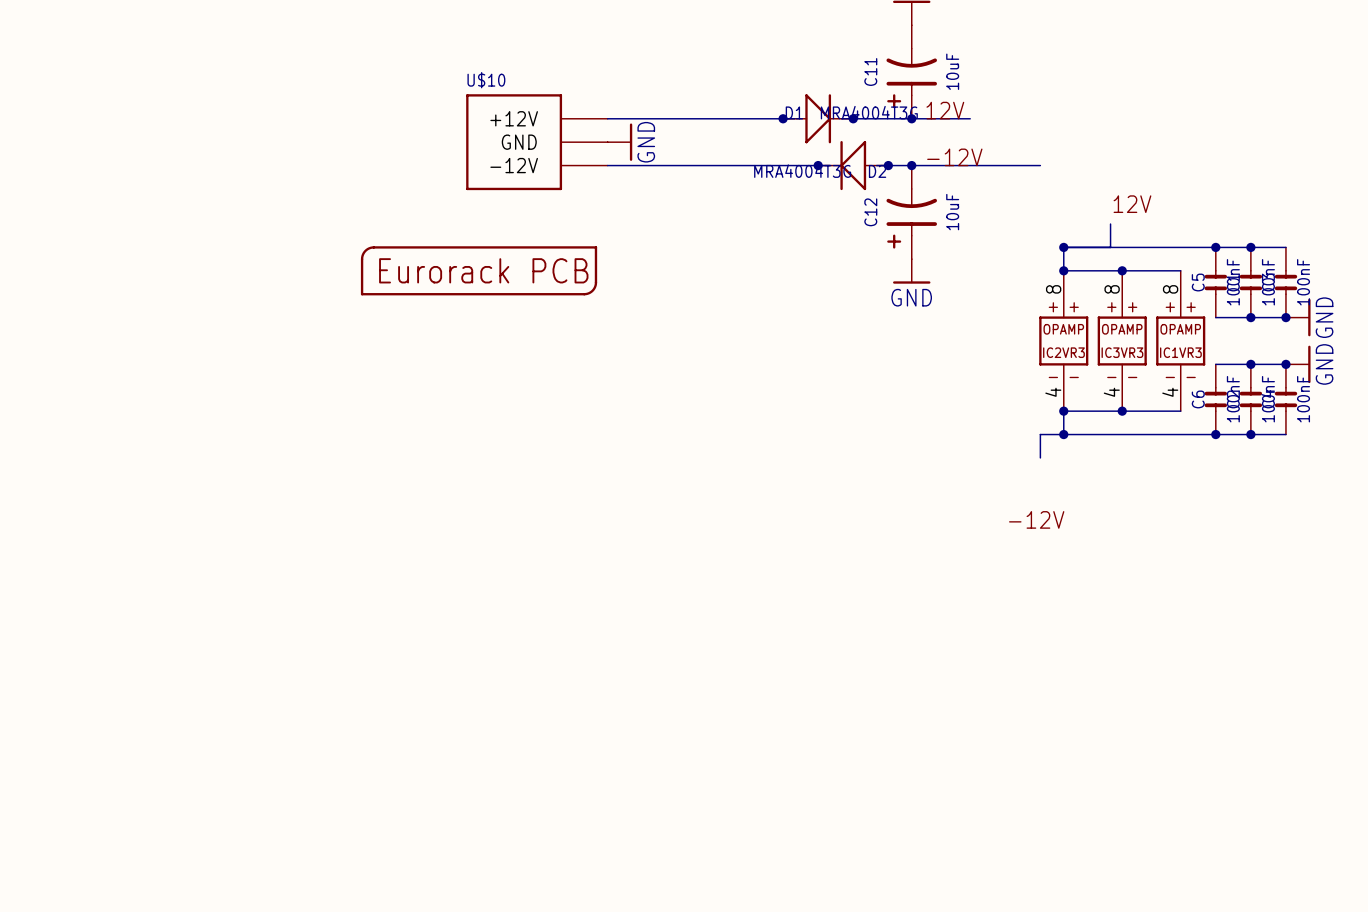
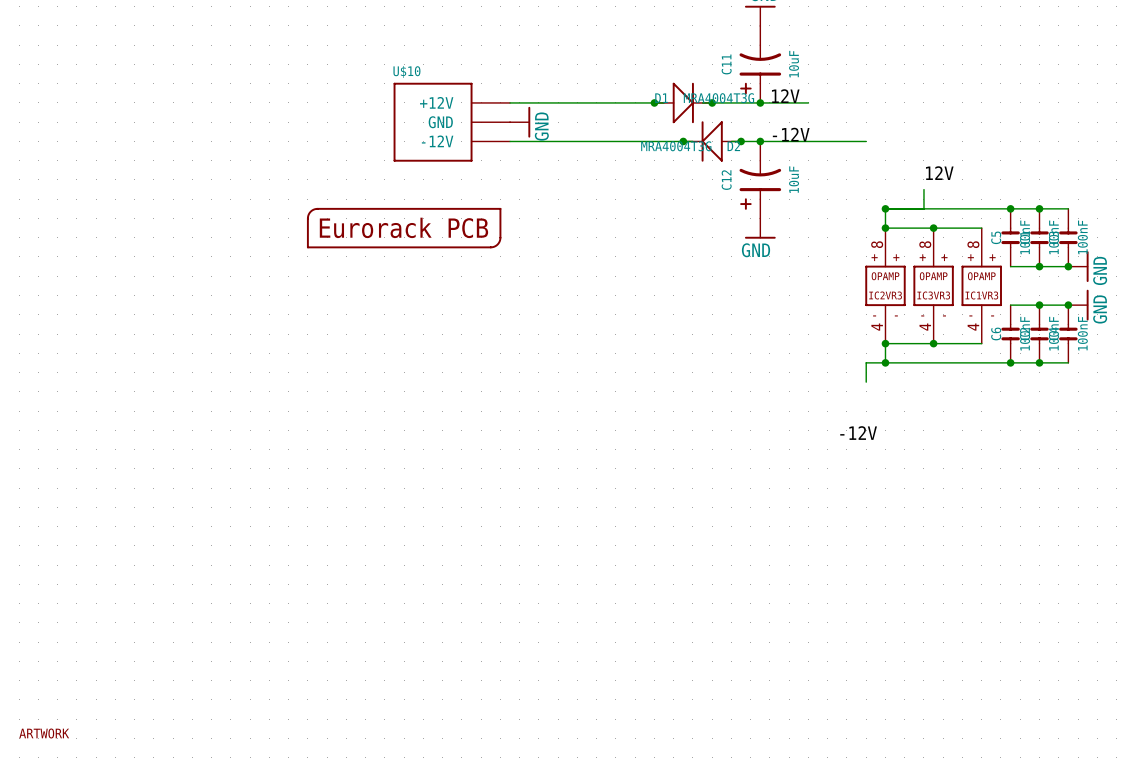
part: none -> (44, 733)

